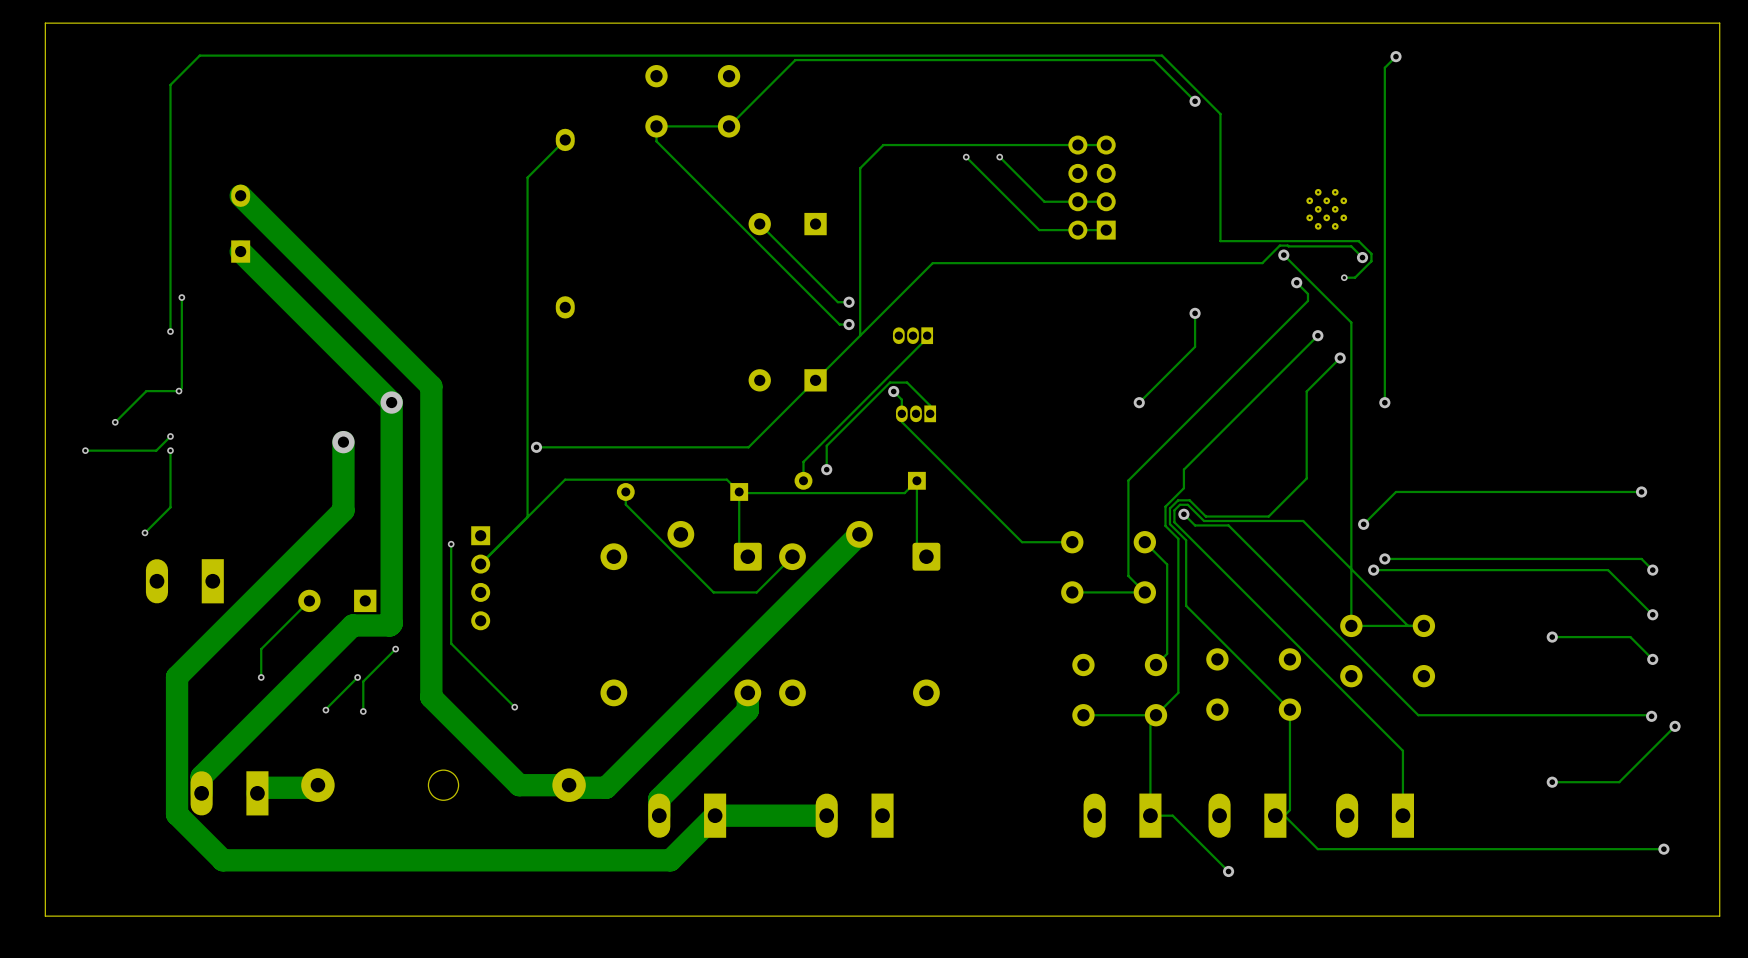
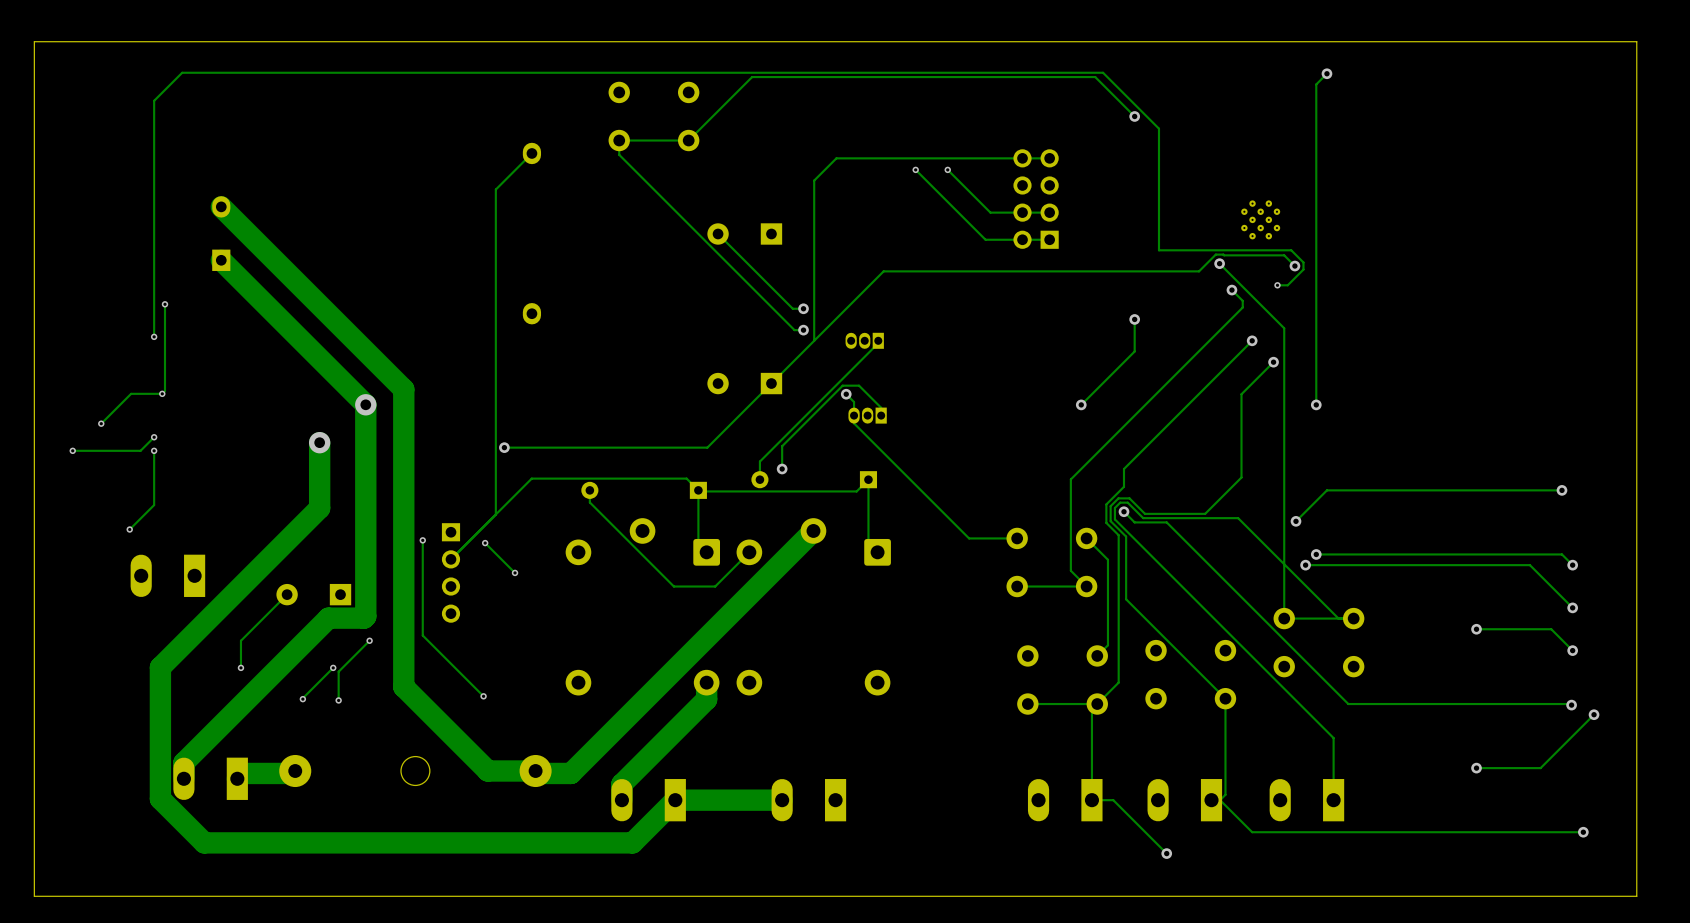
track: none -> (485, 543) (515, 572)
via: none -> (485, 543)
via: none -> (515, 572)

